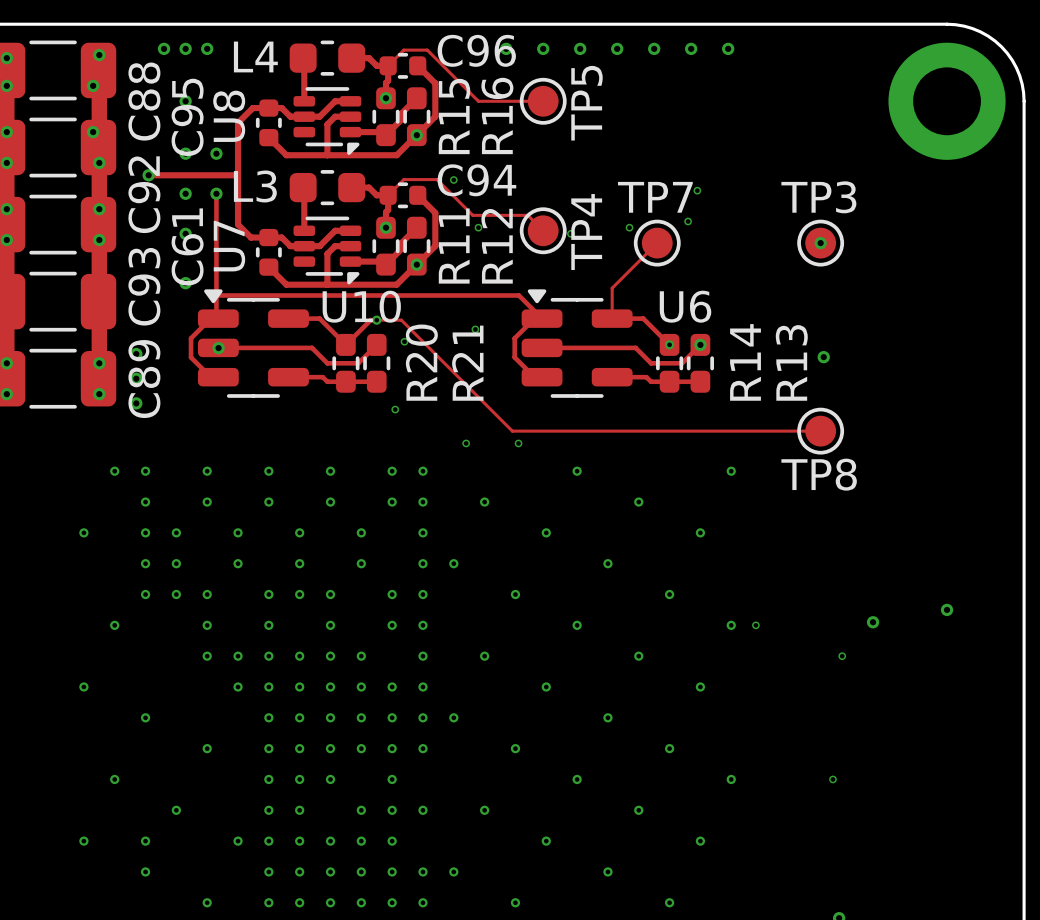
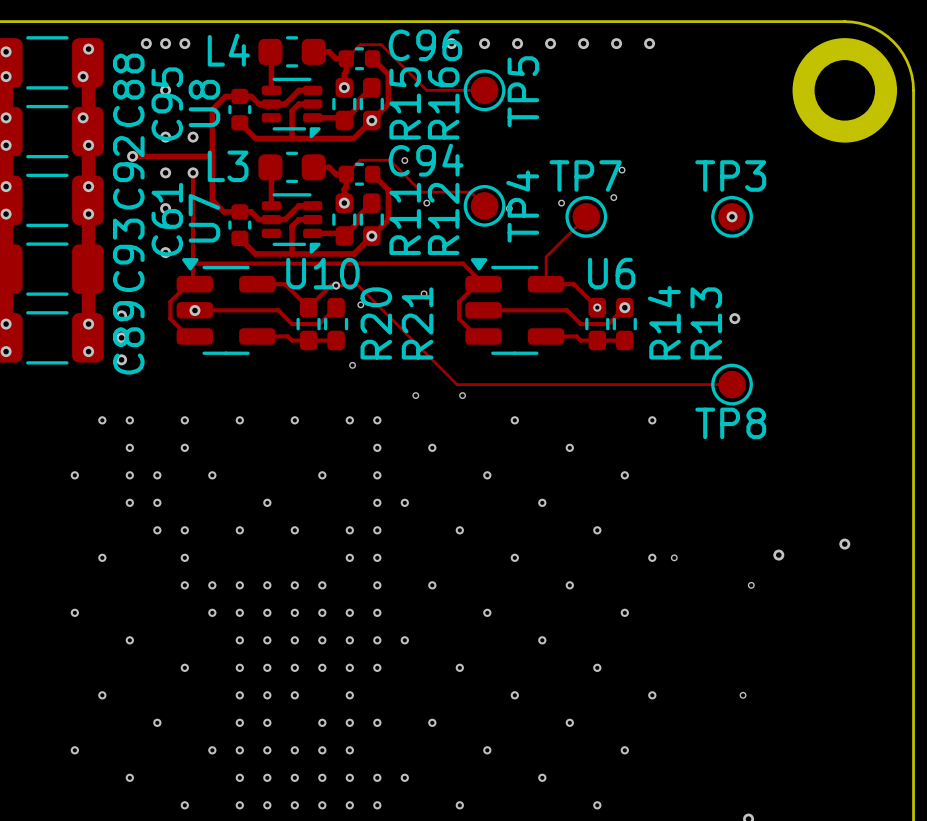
via: (268, 502) -> none
via: (330, 502) -> none
via: (392, 502) -> none
via: (299, 532) -> none
via: (238, 563) -> none
via: (361, 563) -> none
via: (145, 594) -> none
via: (299, 594) -> none
via: (268, 625) -> none
via: (330, 625) -> none
via: (145, 841) -> none

